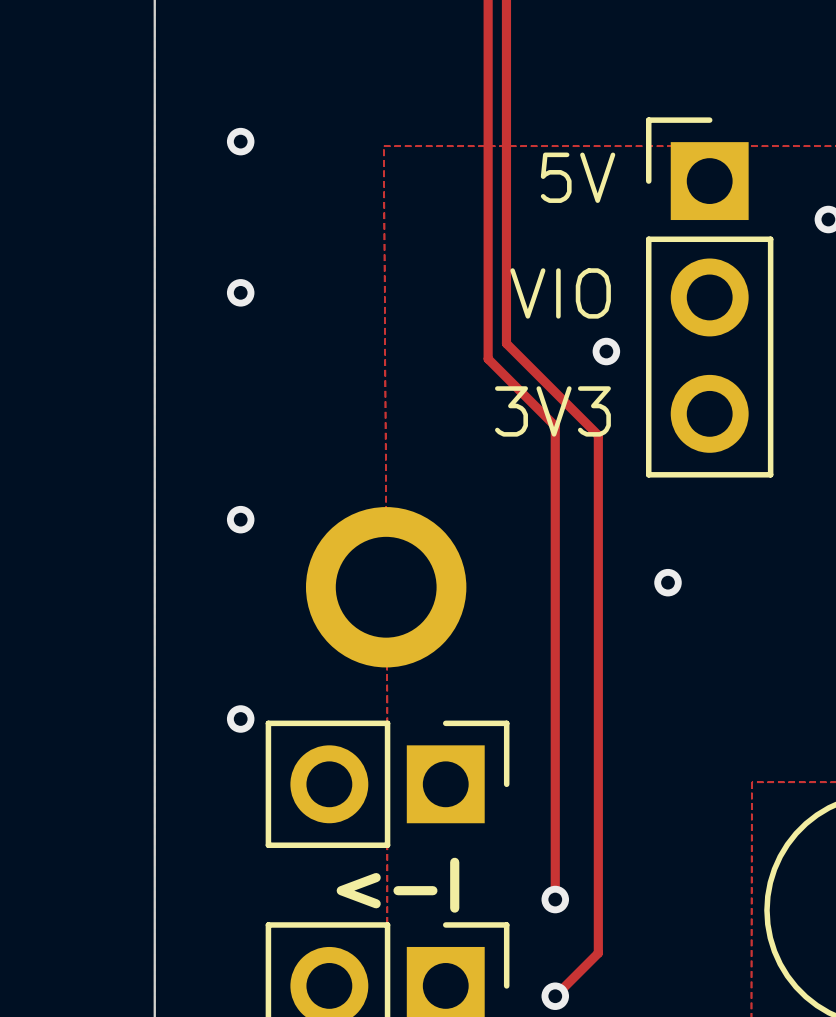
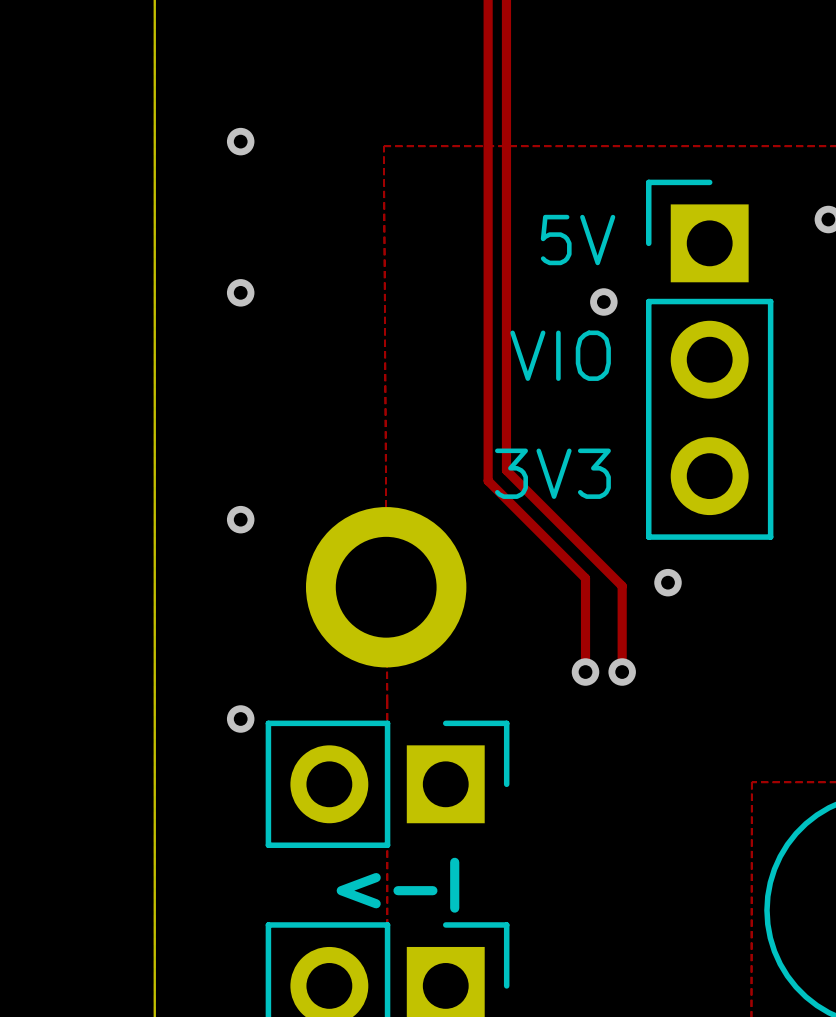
text position: 5V (578, 177) -> 5V (578, 240)
text position: VIO (560, 293) -> VIO (560, 355)
part position: (709, 297) -> (709, 359)
track: (506, 343) (598, 435) (598, 953) (555, 996) -> (506, 343) (506, 470) (622, 586) (622, 672)
via position: (606, 351) -> (603, 302)
track: (488, 358) (555, 426) (555, 899) -> (488, 358) (488, 480) (585, 578) (585, 672)
text position: 3V3 (552, 411) -> 3V3 (552, 473)
via: none -> (585, 672)
via: none -> (622, 672)
via: (555, 899) -> none
via: (555, 996) -> none

